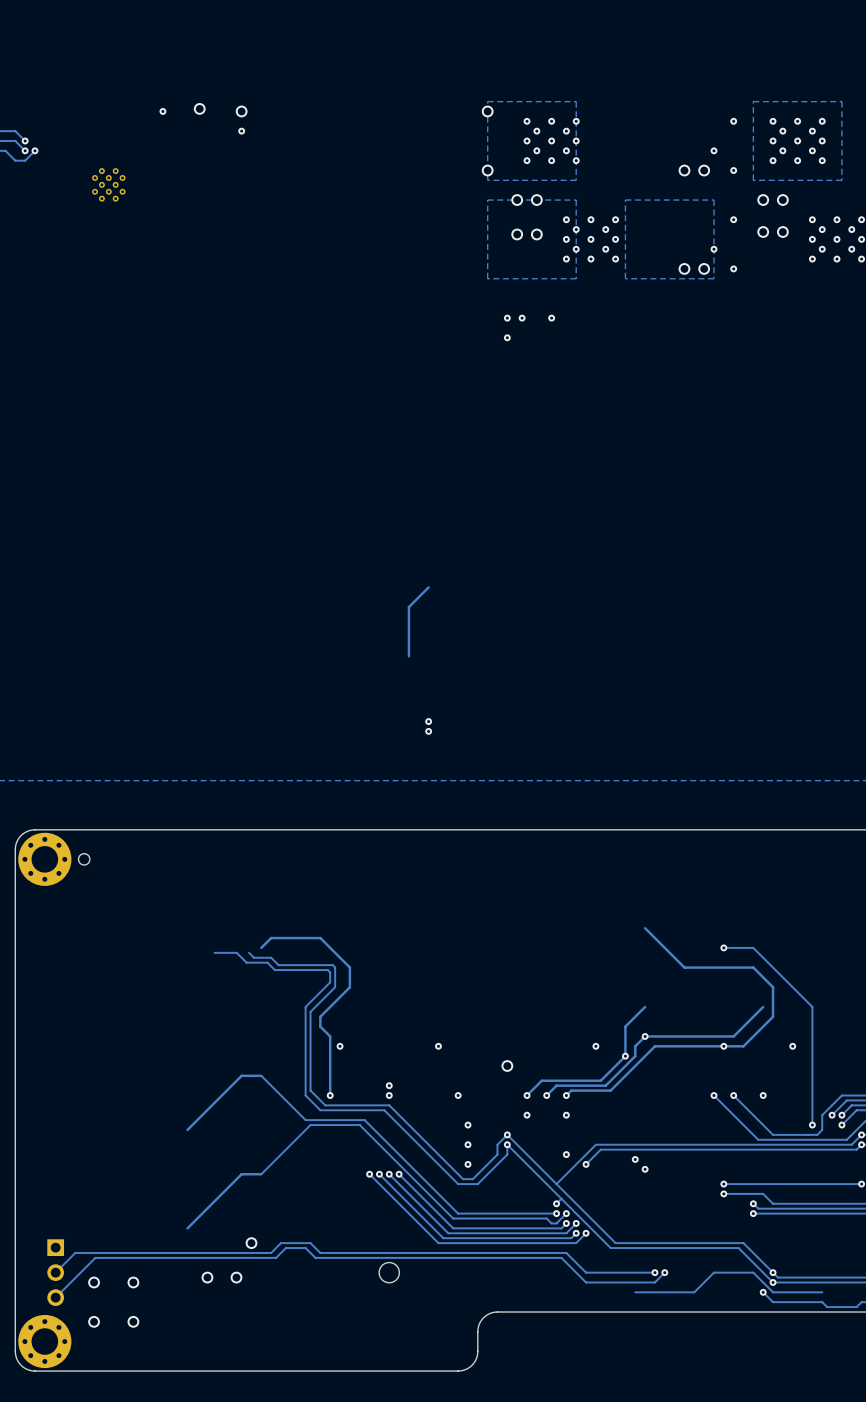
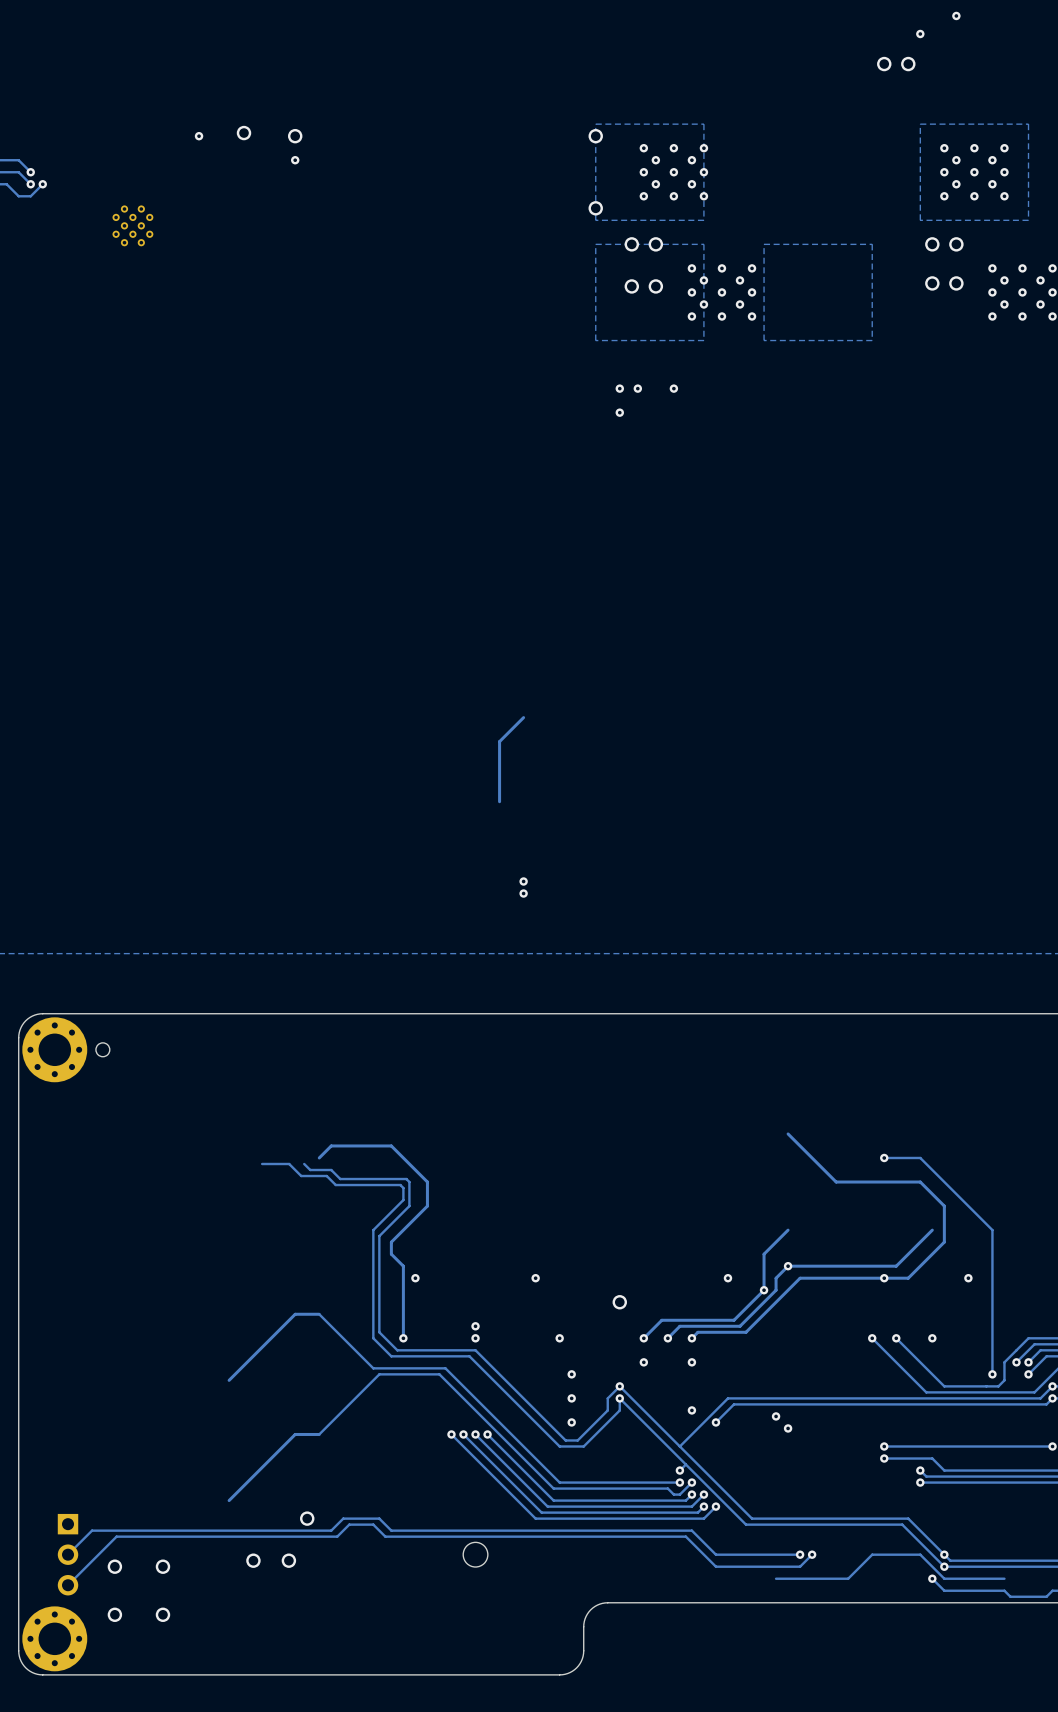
via: none -> (956, 15)
via: none -> (920, 33)
via: none -> (884, 64)
via: none -> (908, 64)
via: (733, 121) -> none
via: (713, 150) -> none
via: (684, 170) -> none
via: (704, 170) -> none
via: (733, 170) -> none
via: (733, 219) -> none
via: (713, 249) -> none
via: (684, 268) -> none
via: (704, 268) -> none
via: (733, 268) -> none

